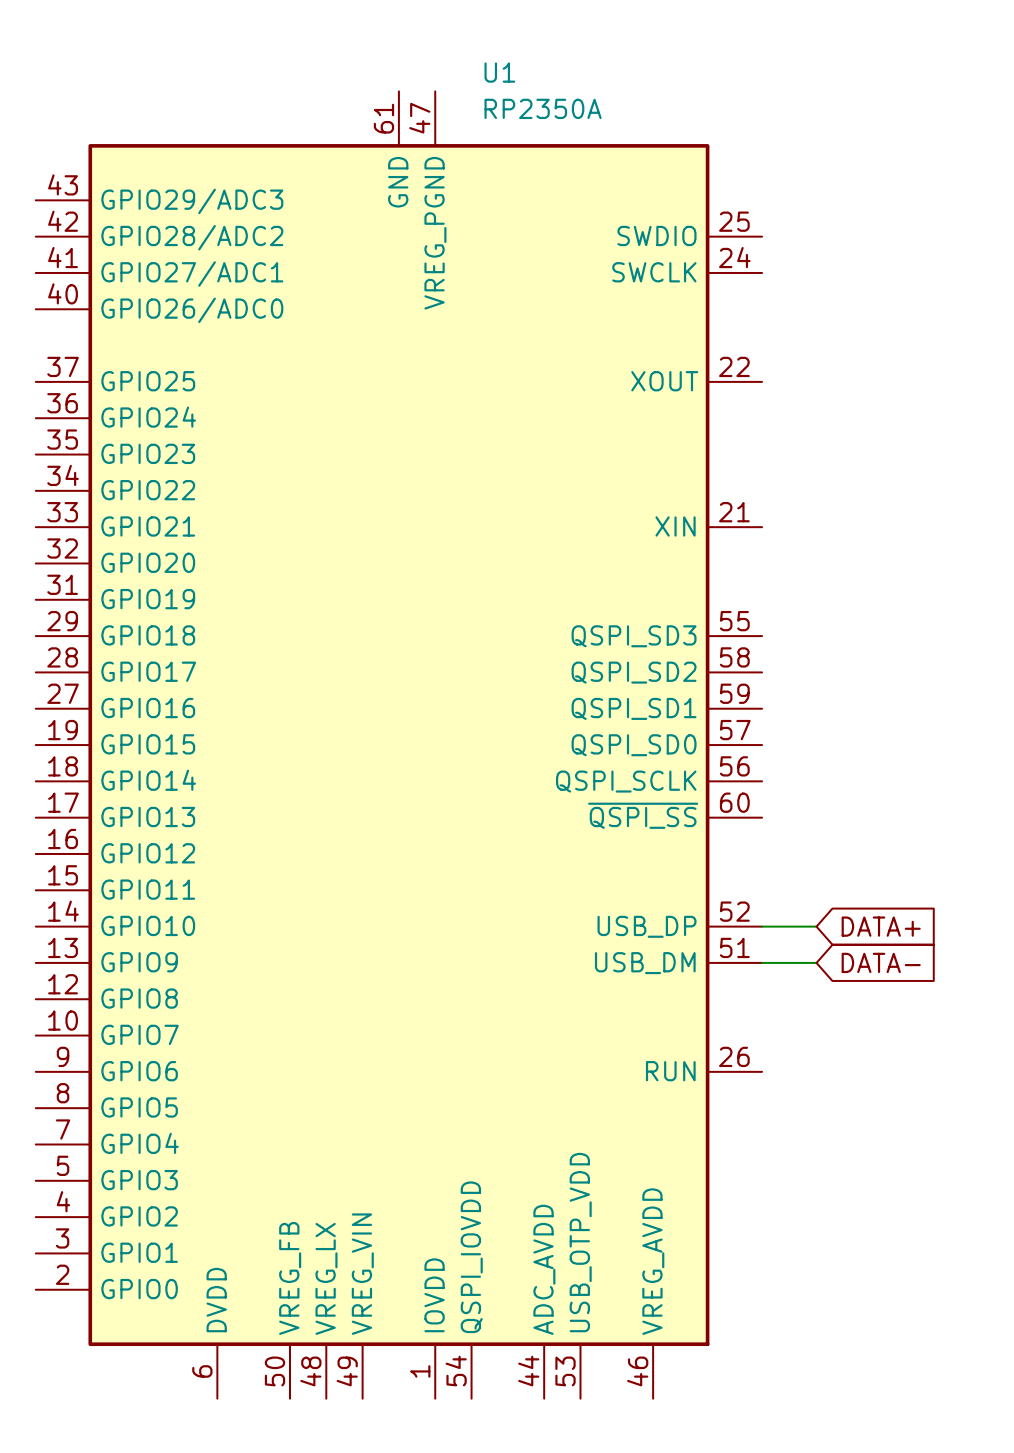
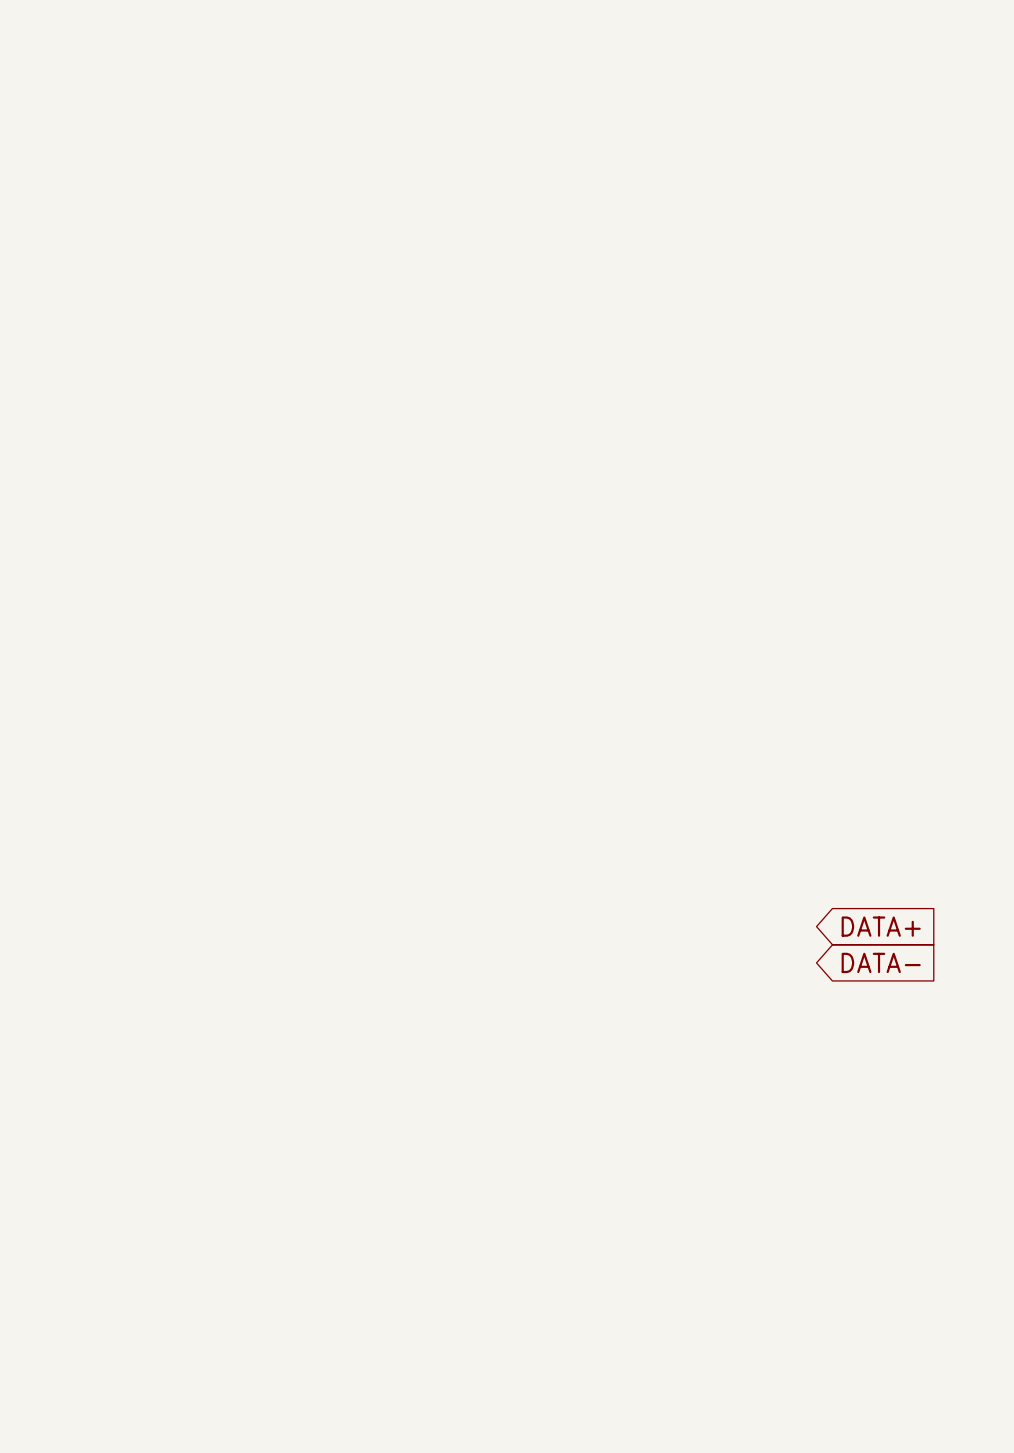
U1: RP2350A (398, 745) -> none
wire: (762, 926) (816, 926) -> none
wire: (762, 962) (816, 962) -> none

